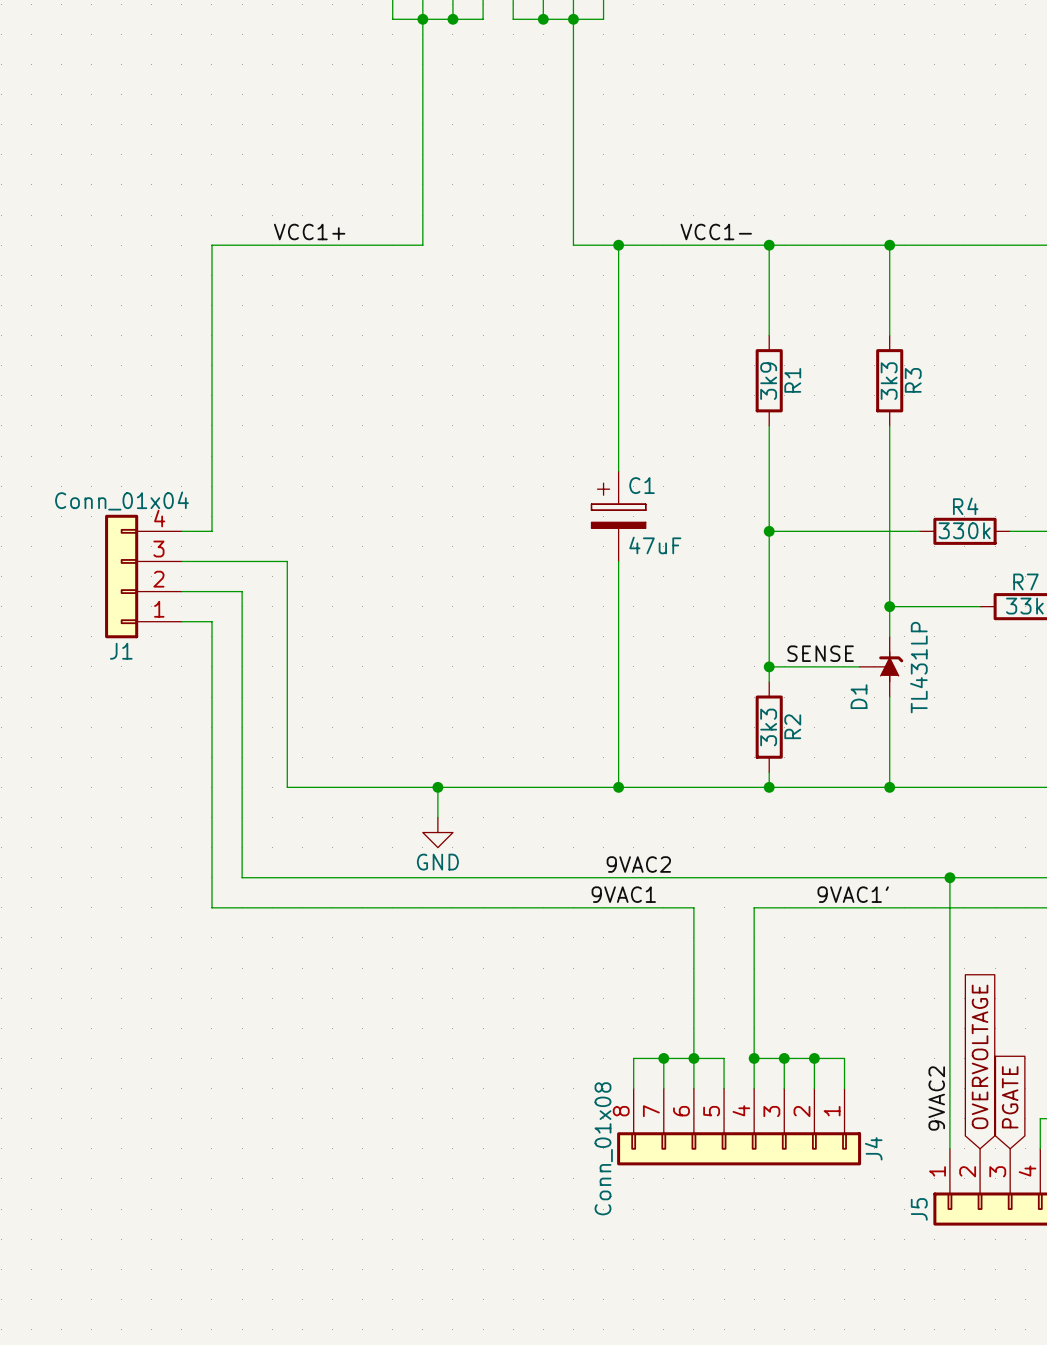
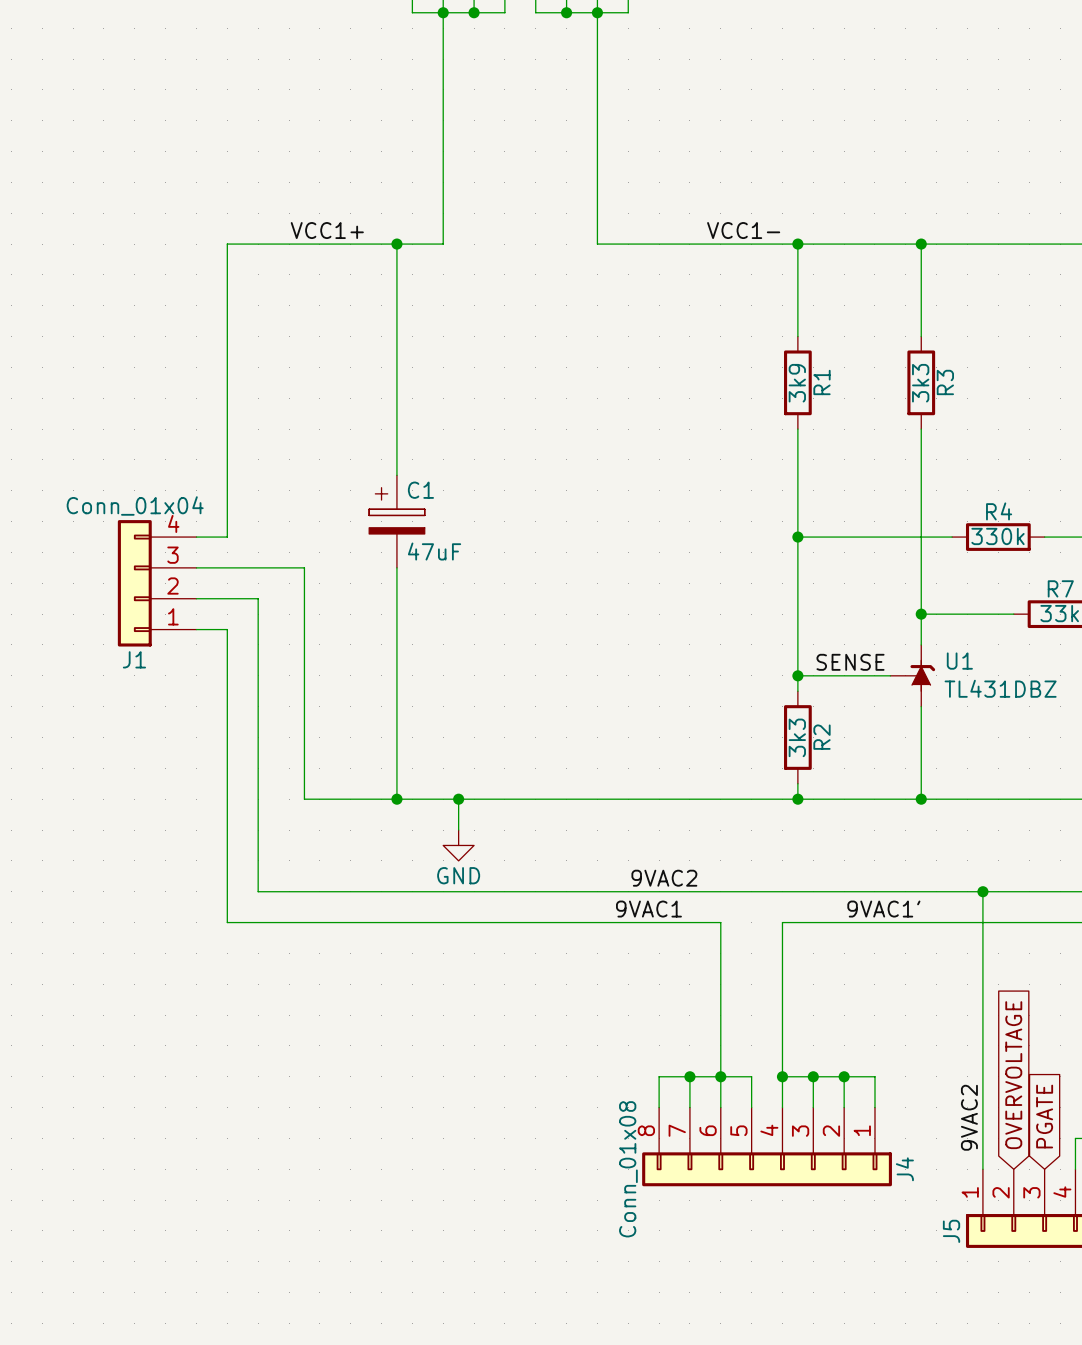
junction: none -> (396, 244)
wire: (618, 245) (618, 471) -> (396, 244) (396, 475)
junction: (618, 245) -> none
C1 position: (618, 516) -> (396, 521)
wire: (618, 561) (618, 787) -> (396, 567) (396, 799)
D1 value: TL431LP (918, 667) -> TL431DBZ (1000, 688)
D1 name: D1 (859, 696) -> U1 (959, 661)
junction: none -> (396, 799)
junction: (618, 787) -> none

